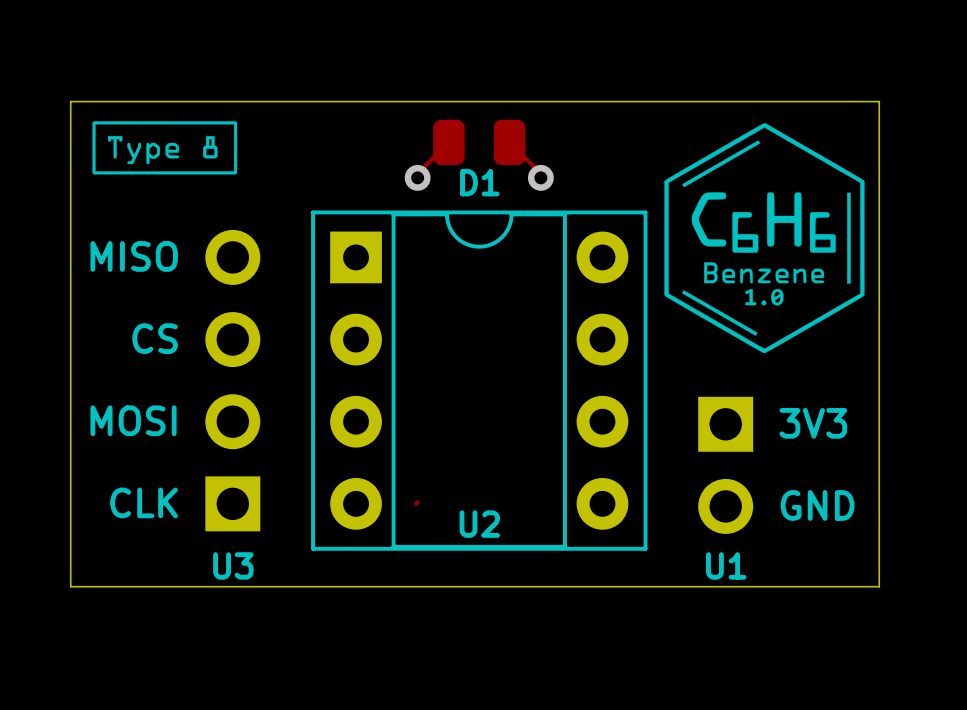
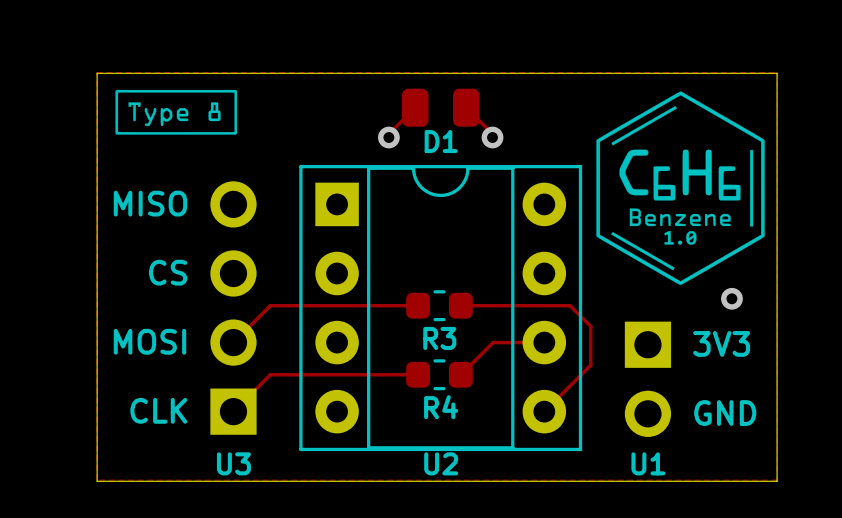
zone outline: none -> (96, 72) (96, 480) (777, 480) (777, 72) (96, 72)
via: none -> (731, 298)
track: none -> (418, 305) (270, 305) (233, 342)
R3: none -> (439, 305)
track: none -> (460, 305) (570, 305) (590, 326) (590, 365) (544, 411)
track: none -> (544, 342) (493, 342) (460, 374)
track: none -> (418, 374) (270, 374) (233, 411)
R4: none -> (439, 374)
track: (417, 502) (416, 503) -> none
U2 name position: U2 (479, 524) -> U2 (441, 463)

